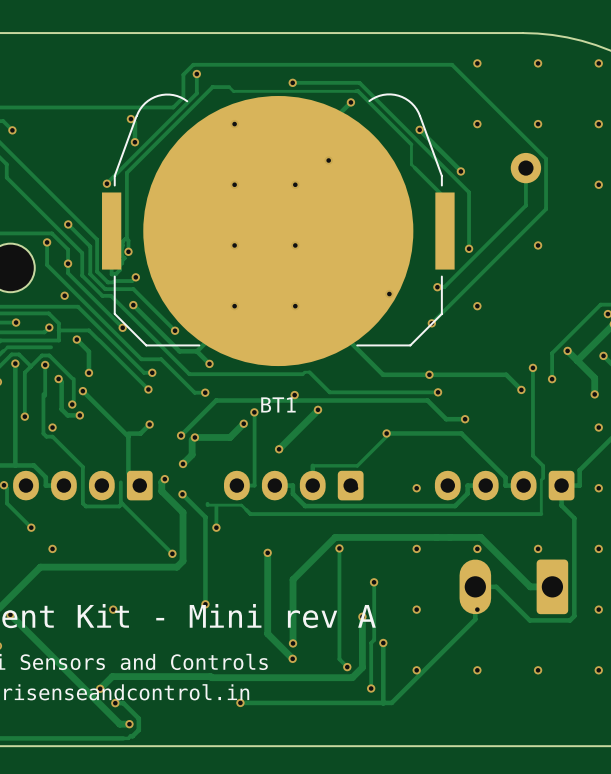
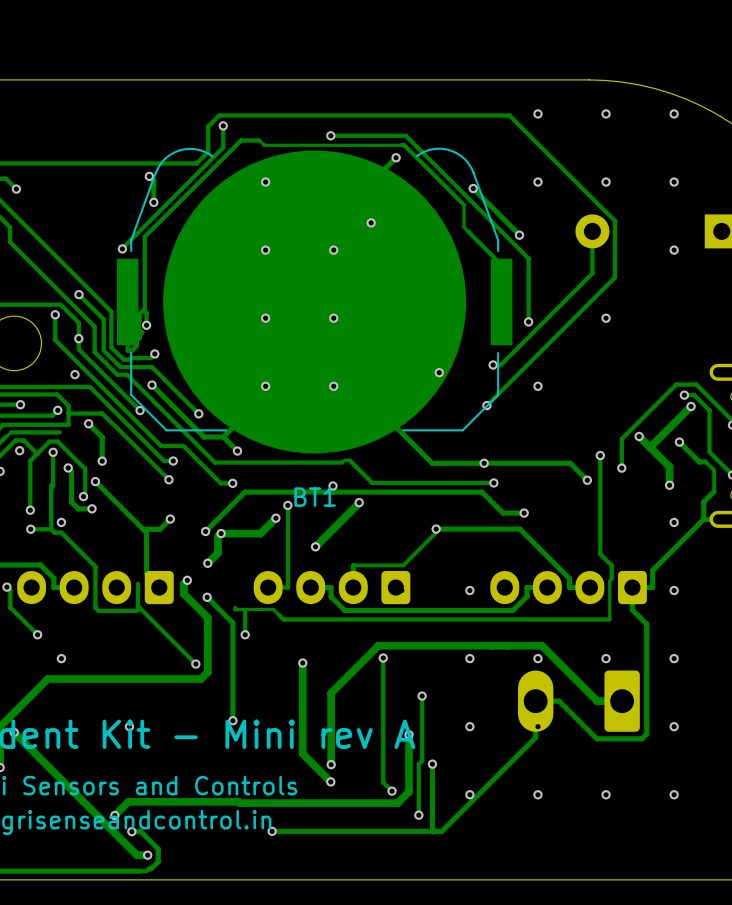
track: (15, 363) (15, 465) -> none
via: none -> (30, 529)
track: none -> (51, 529) (30, 529)

